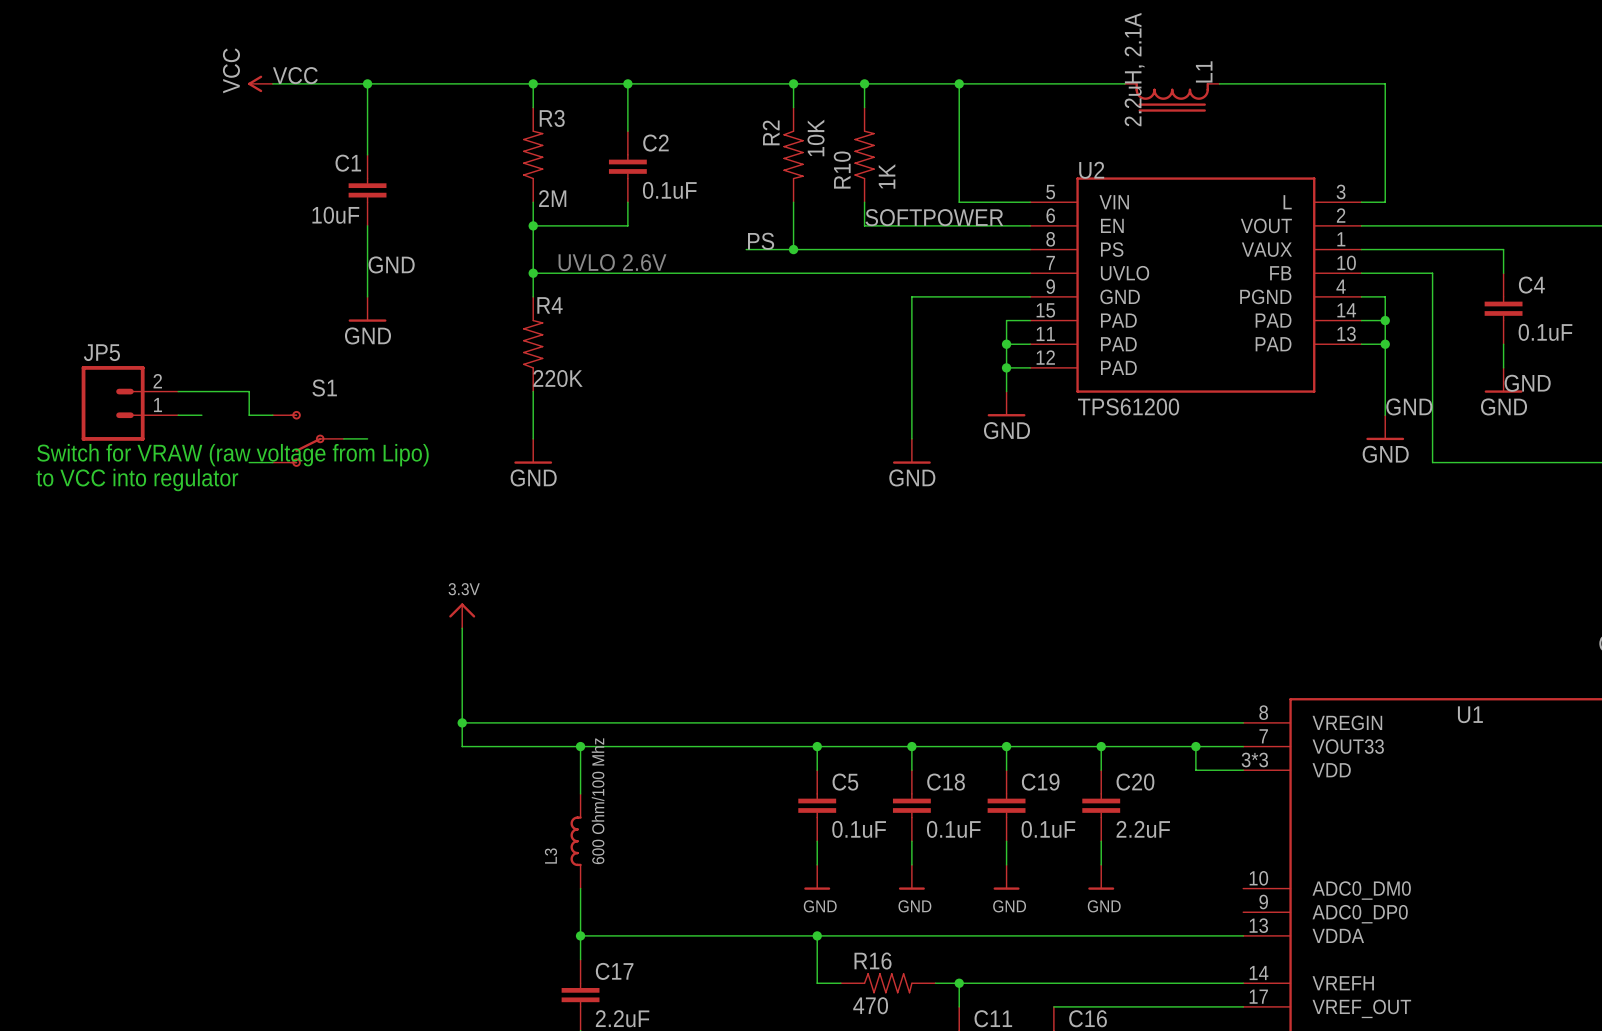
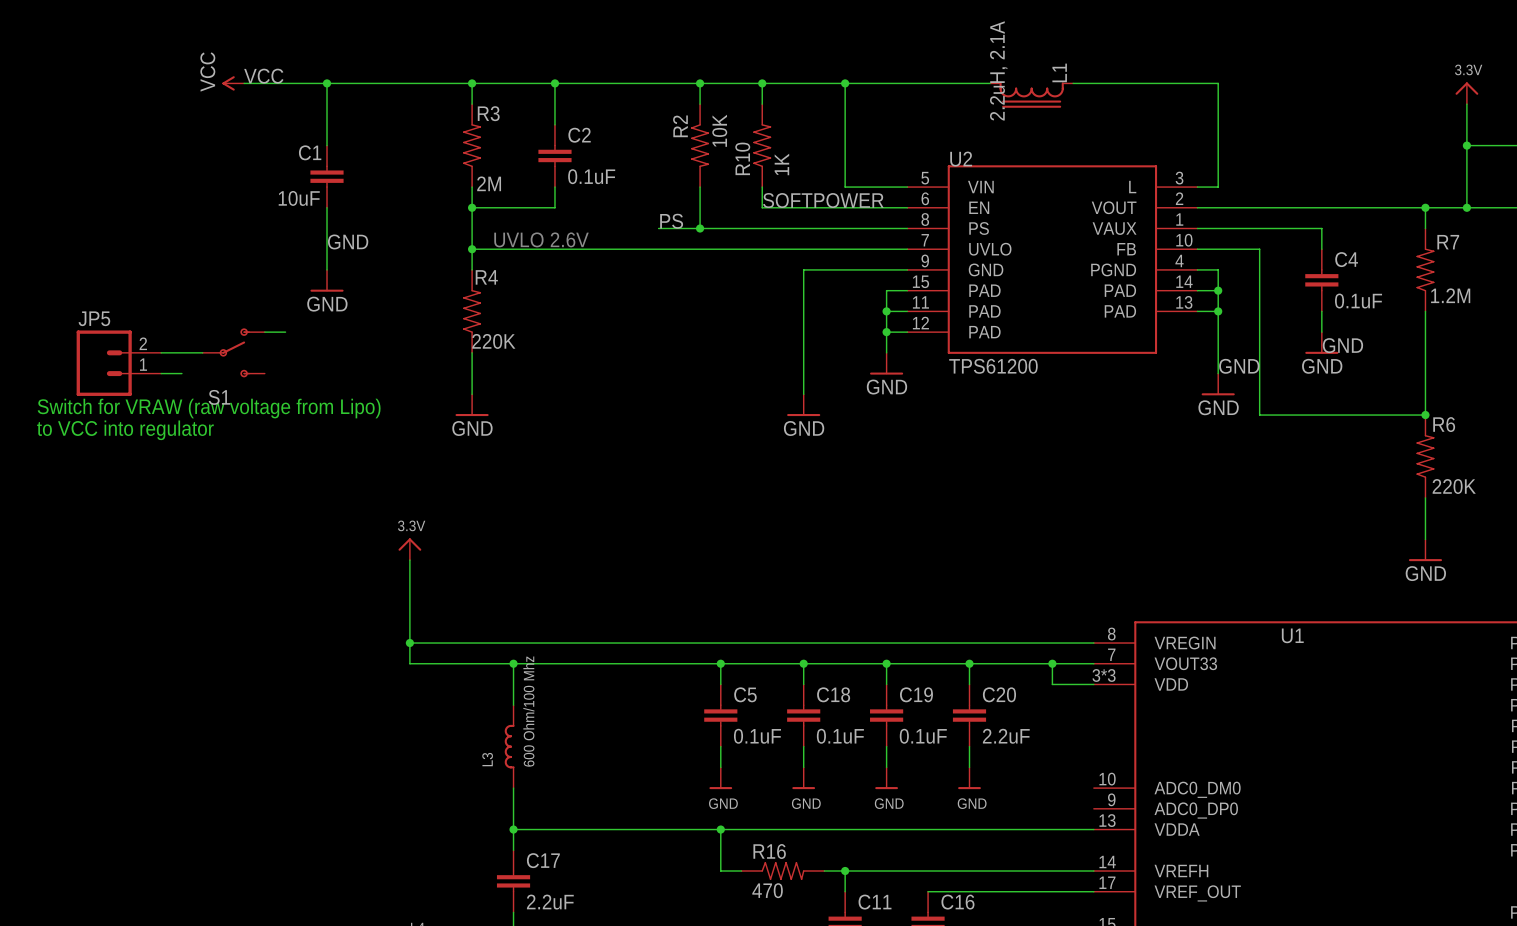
wire: (225, 391) (249, 391) (249, 415) (272, 415) -> none
S1 rotation: 0° (307, 438) -> 180° (234, 352)
S1 position: (308, 438) -> (233, 352)
wire: (343, 438) (367, 438) -> (264, 332) (285, 332)
wire: (249, 462) (272, 462) -> none

